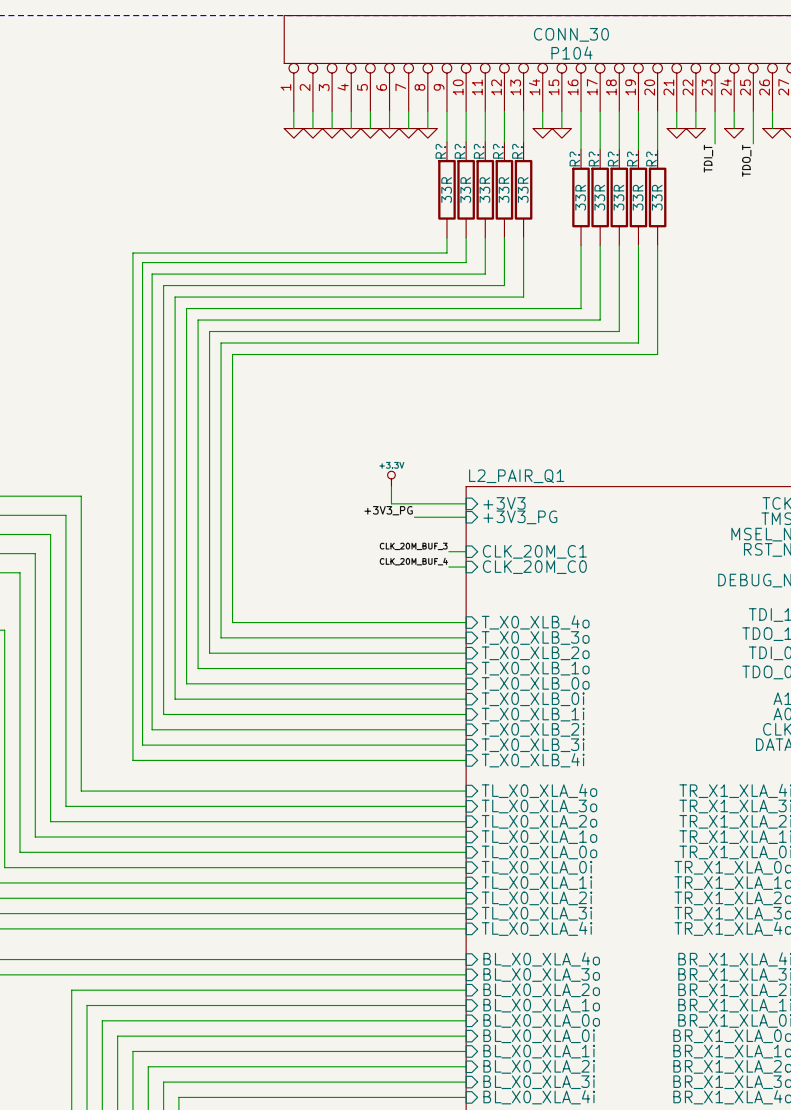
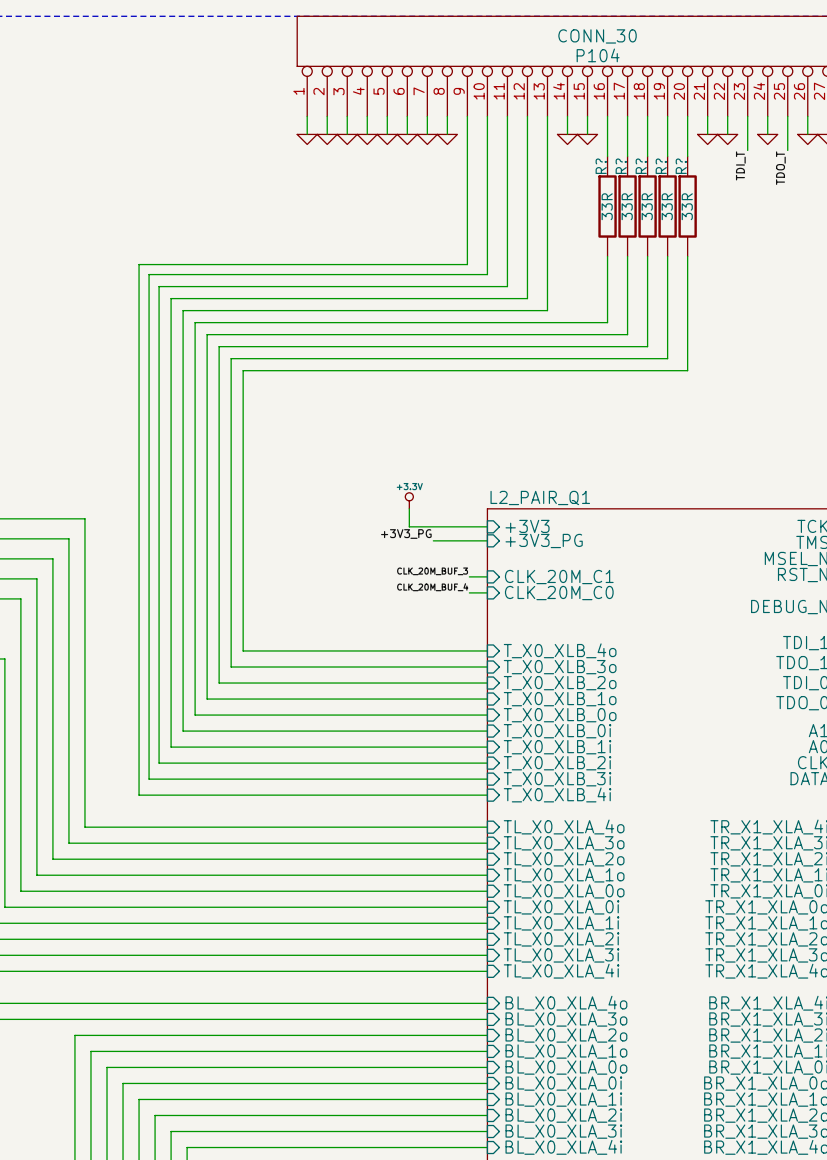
wire: none -> (467, 148) (467, 248)
wire: none -> (487, 148) (487, 248)
wire: none -> (507, 148) (507, 248)
wire: none -> (527, 148) (527, 248)
wire: none -> (547, 148) (547, 248)
R?: 33R (446, 189) -> none
R?: 33R (466, 189) -> none
R?: 33R (485, 189) -> none
R?: 33R (504, 189) -> none
R?: 33R (523, 189) -> none

